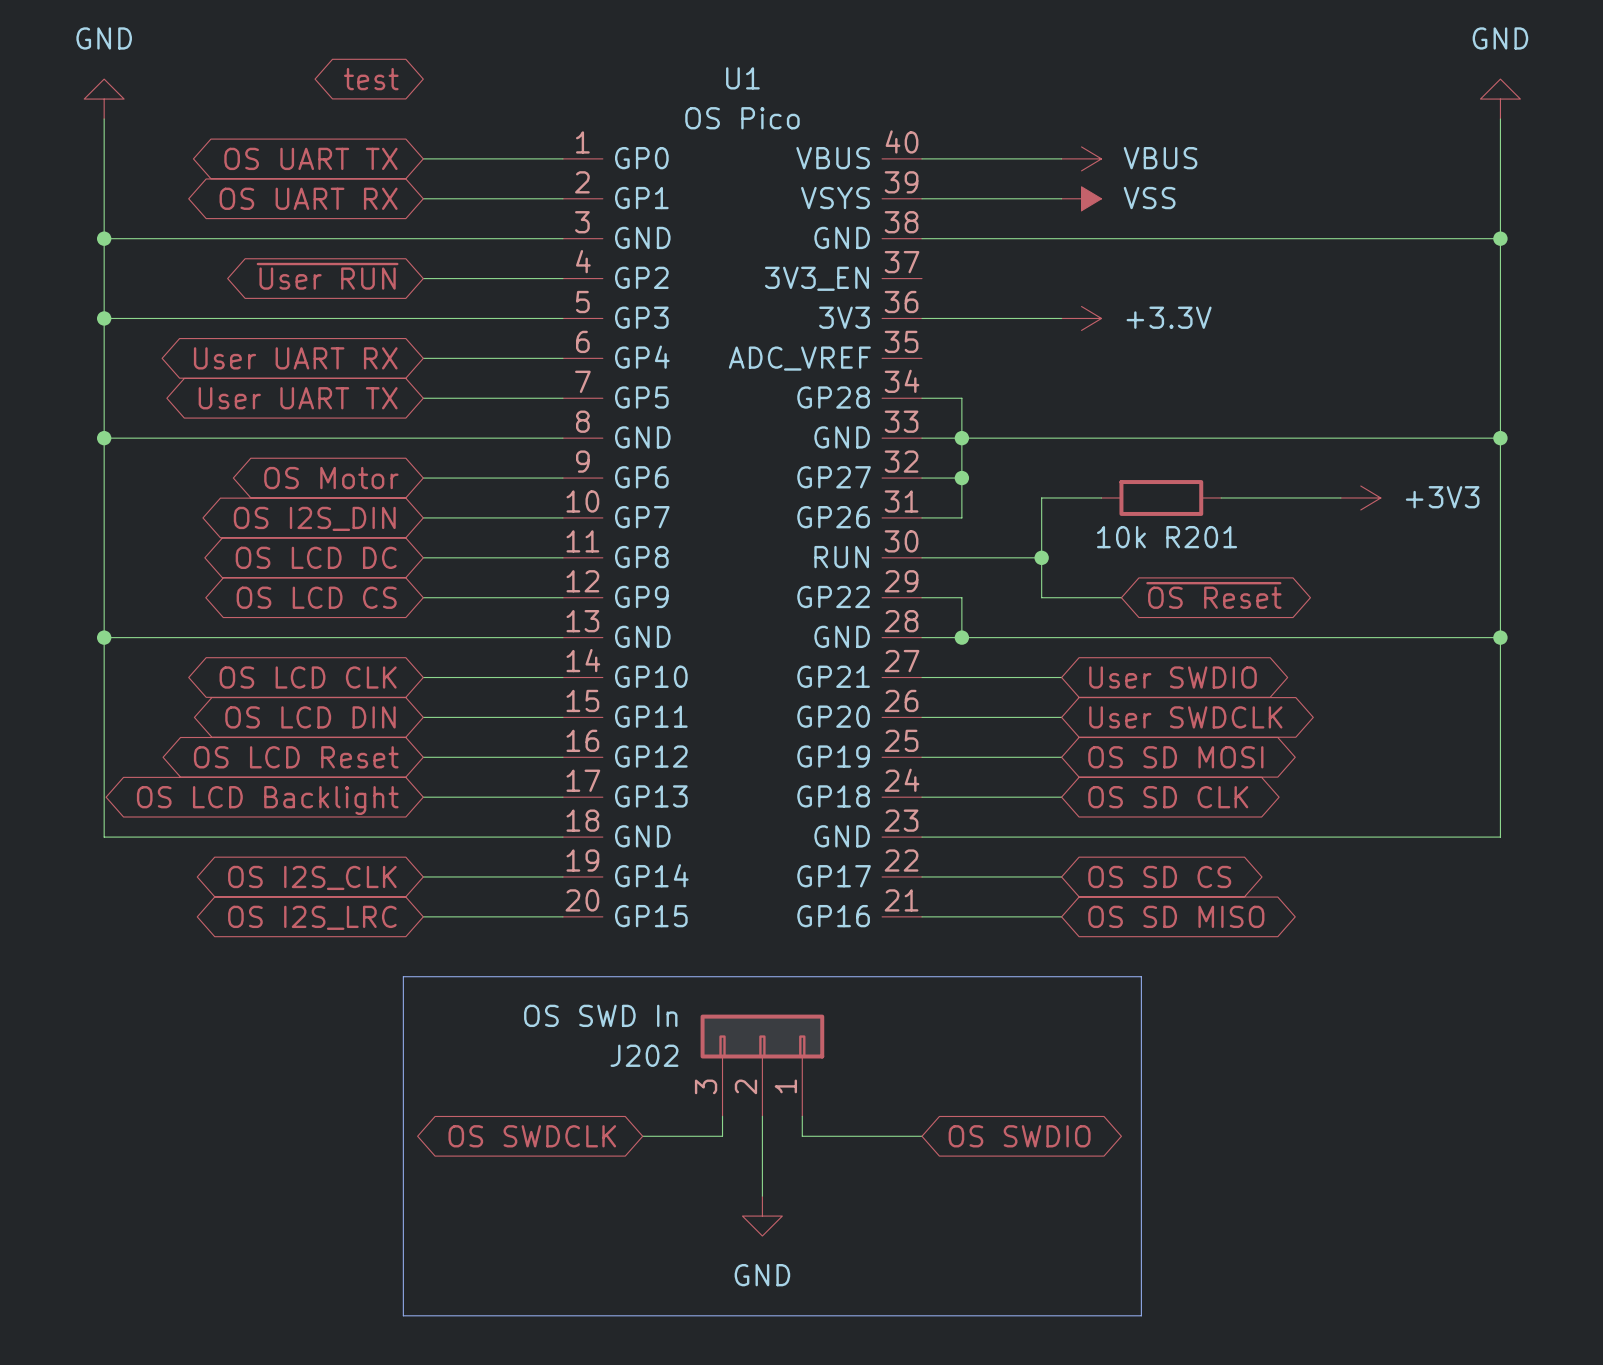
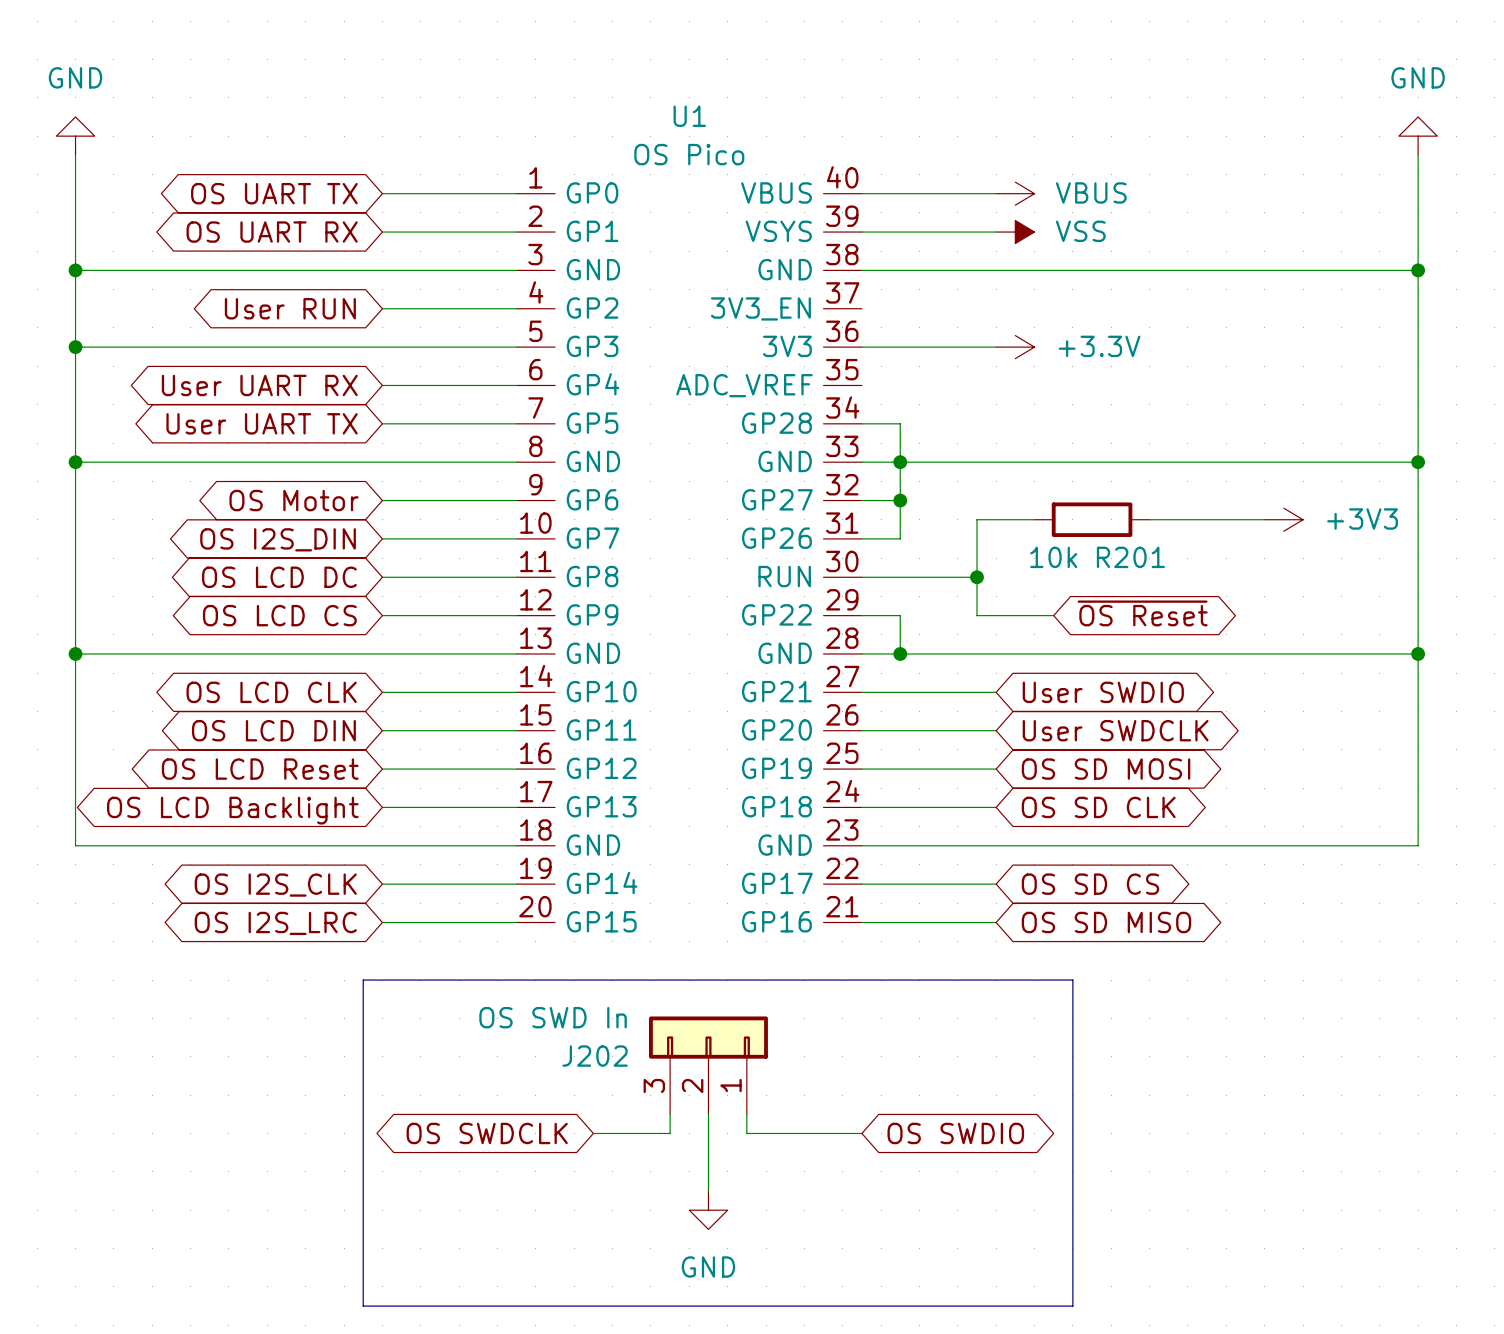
global label: test (371, 79) -> none
global label: ~{User RUN} (327, 276) -> User RUN (290, 308)

